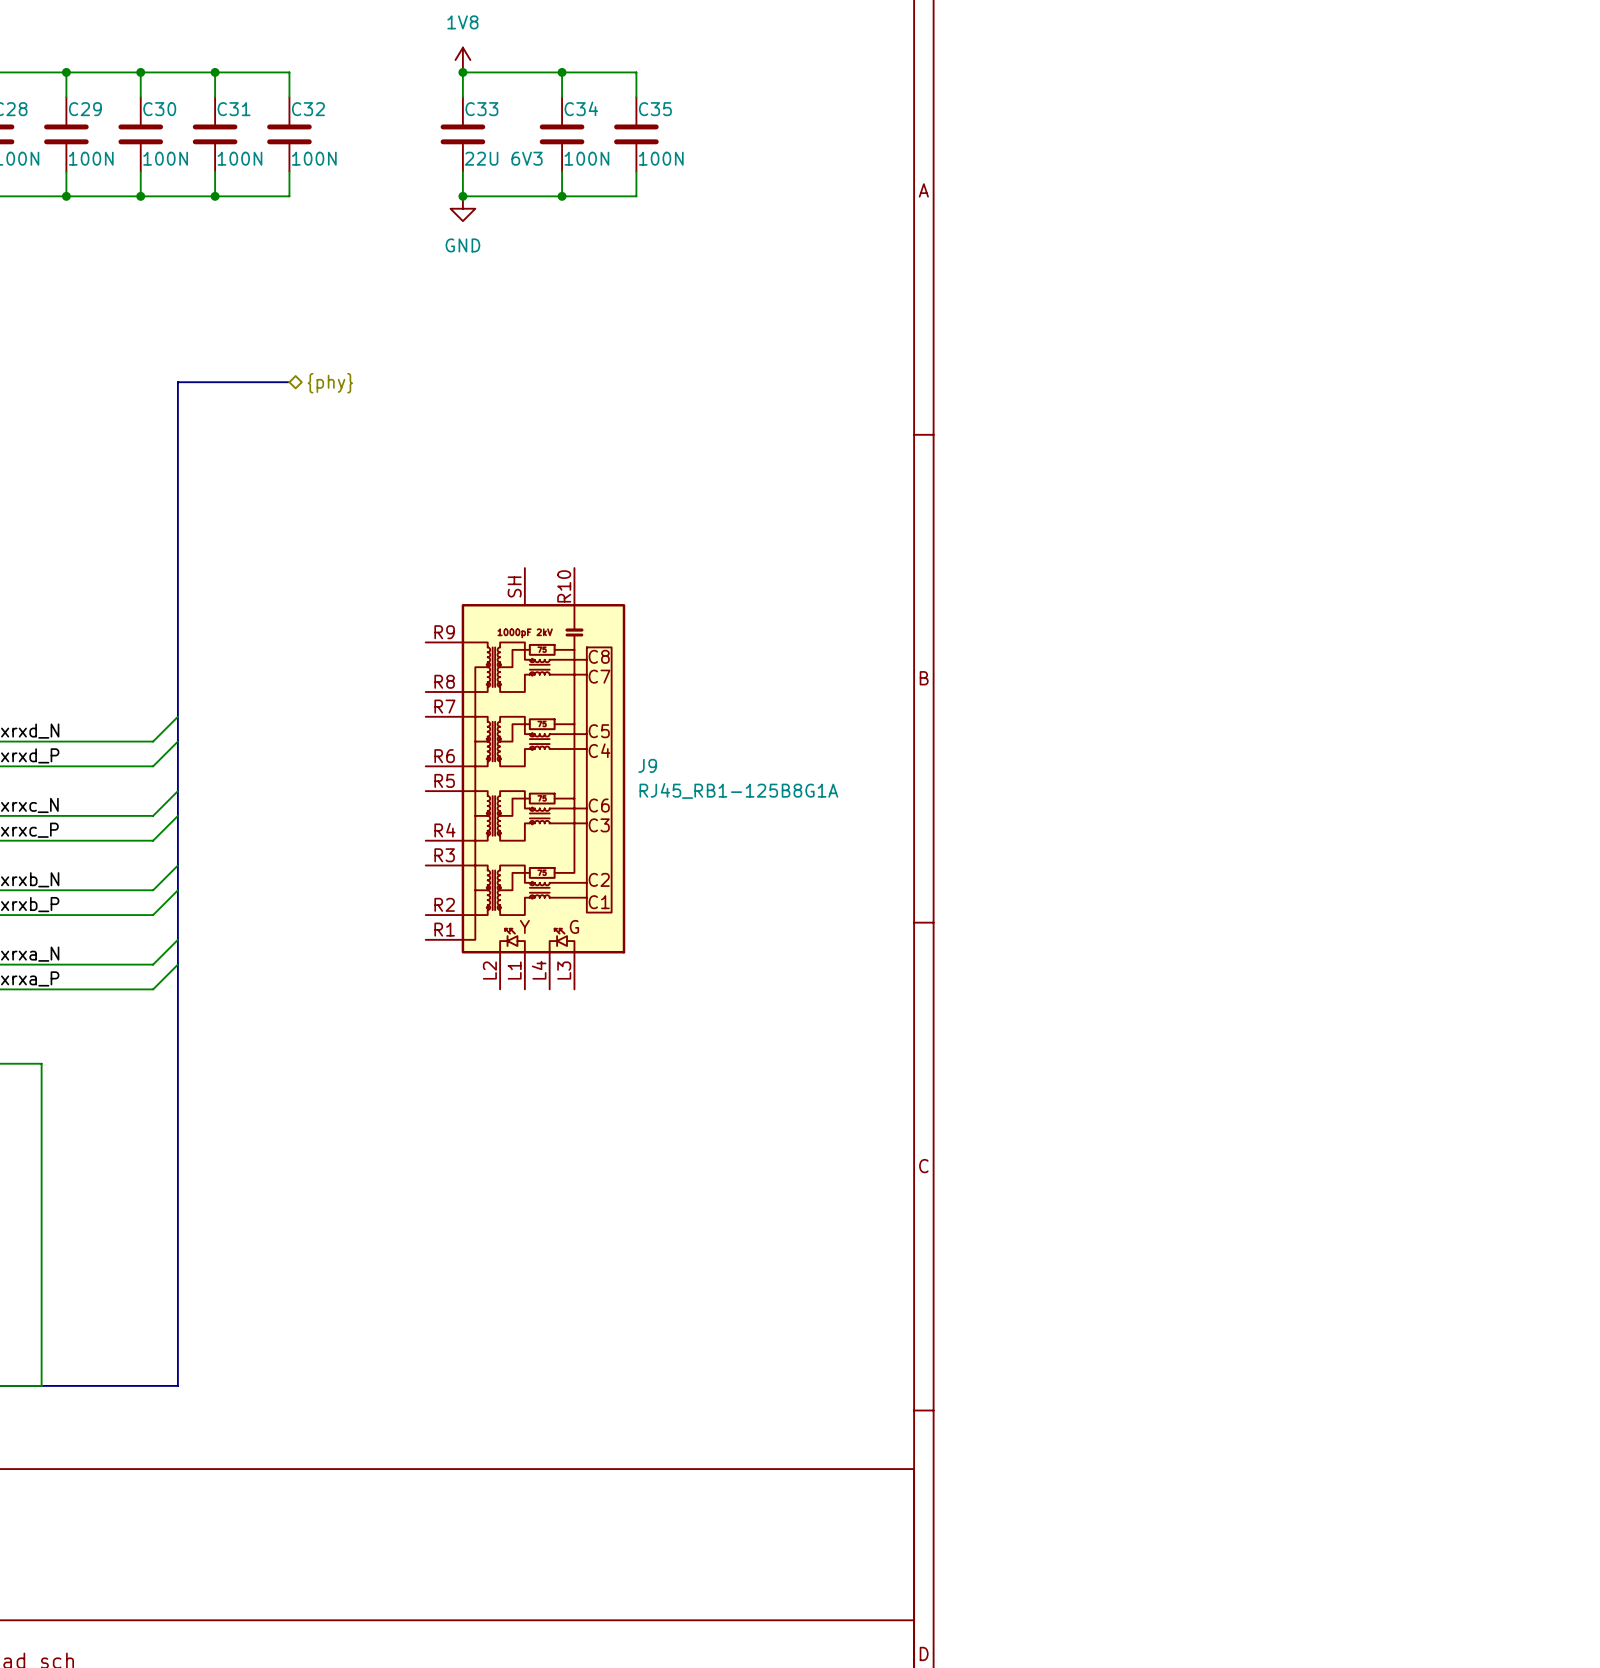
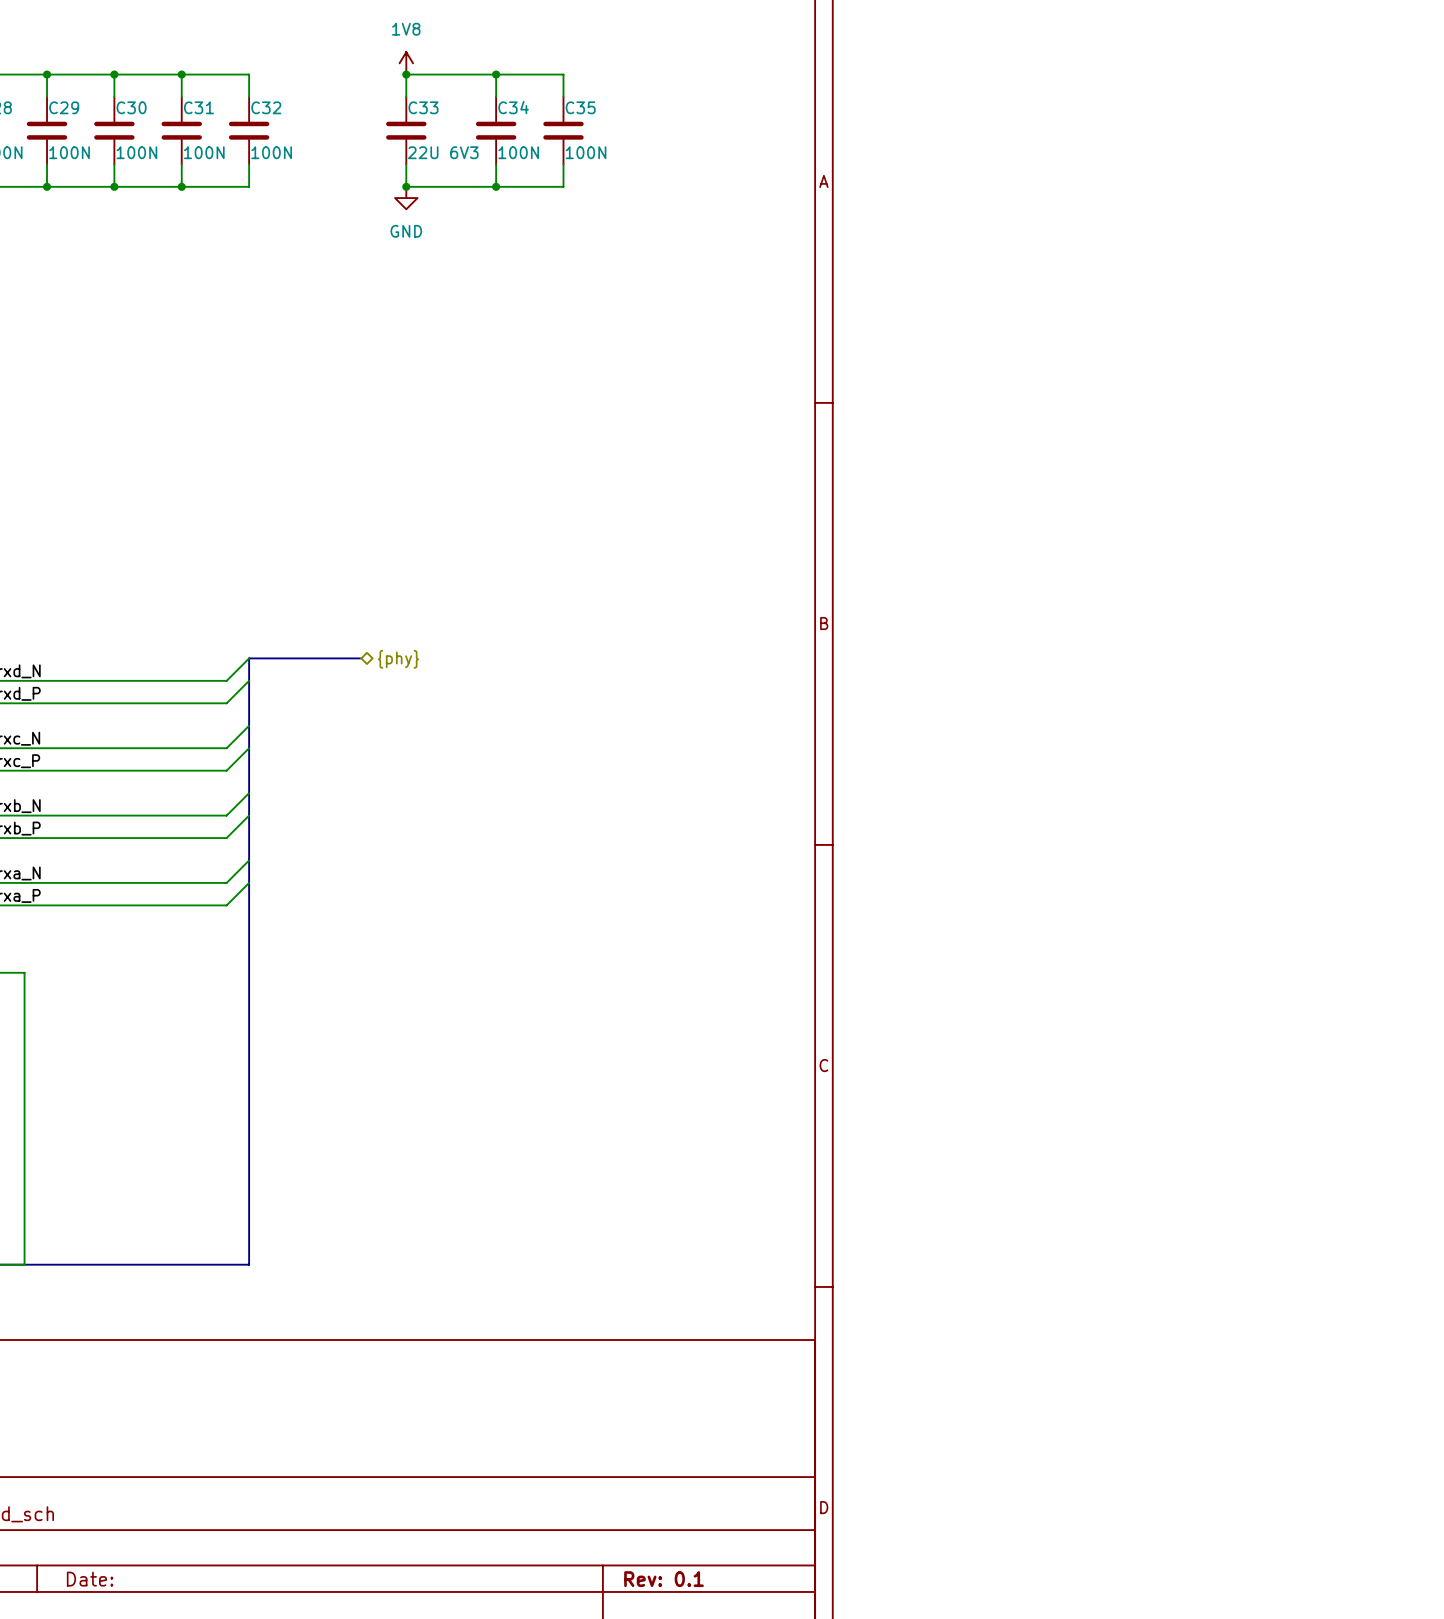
bus: (289, 382) (177, 382) (177, 1385) -> (361, 658) (249, 658) (249, 1264) (148, 1264)
hierarchical label: {phy} (330, 383) -> none
wire: (177, 716) (153, 741) -> (249, 658) (226, 680) (125, 680)
hierarchical label: none -> {phy} (398, 659)
wire: (177, 741) (153, 766) -> (249, 680) (226, 703) (125, 703)
J9: RJ45_RB1-125B8G1A (525, 778) -> none
wire: (177, 791) (153, 815) -> (249, 725) (226, 748) (125, 748)
wire: (177, 815) (153, 840) -> (249, 748) (226, 770) (125, 770)
wire: (177, 865) (153, 890) -> (249, 793) (226, 815) (125, 815)
wire: (177, 890) (153, 915) -> (249, 815) (226, 838) (125, 838)
wire: (177, 939) (153, 964) -> (249, 860) (226, 882) (125, 882)
wire: (177, 964) (153, 989) -> (249, 882) (226, 905) (125, 905)

